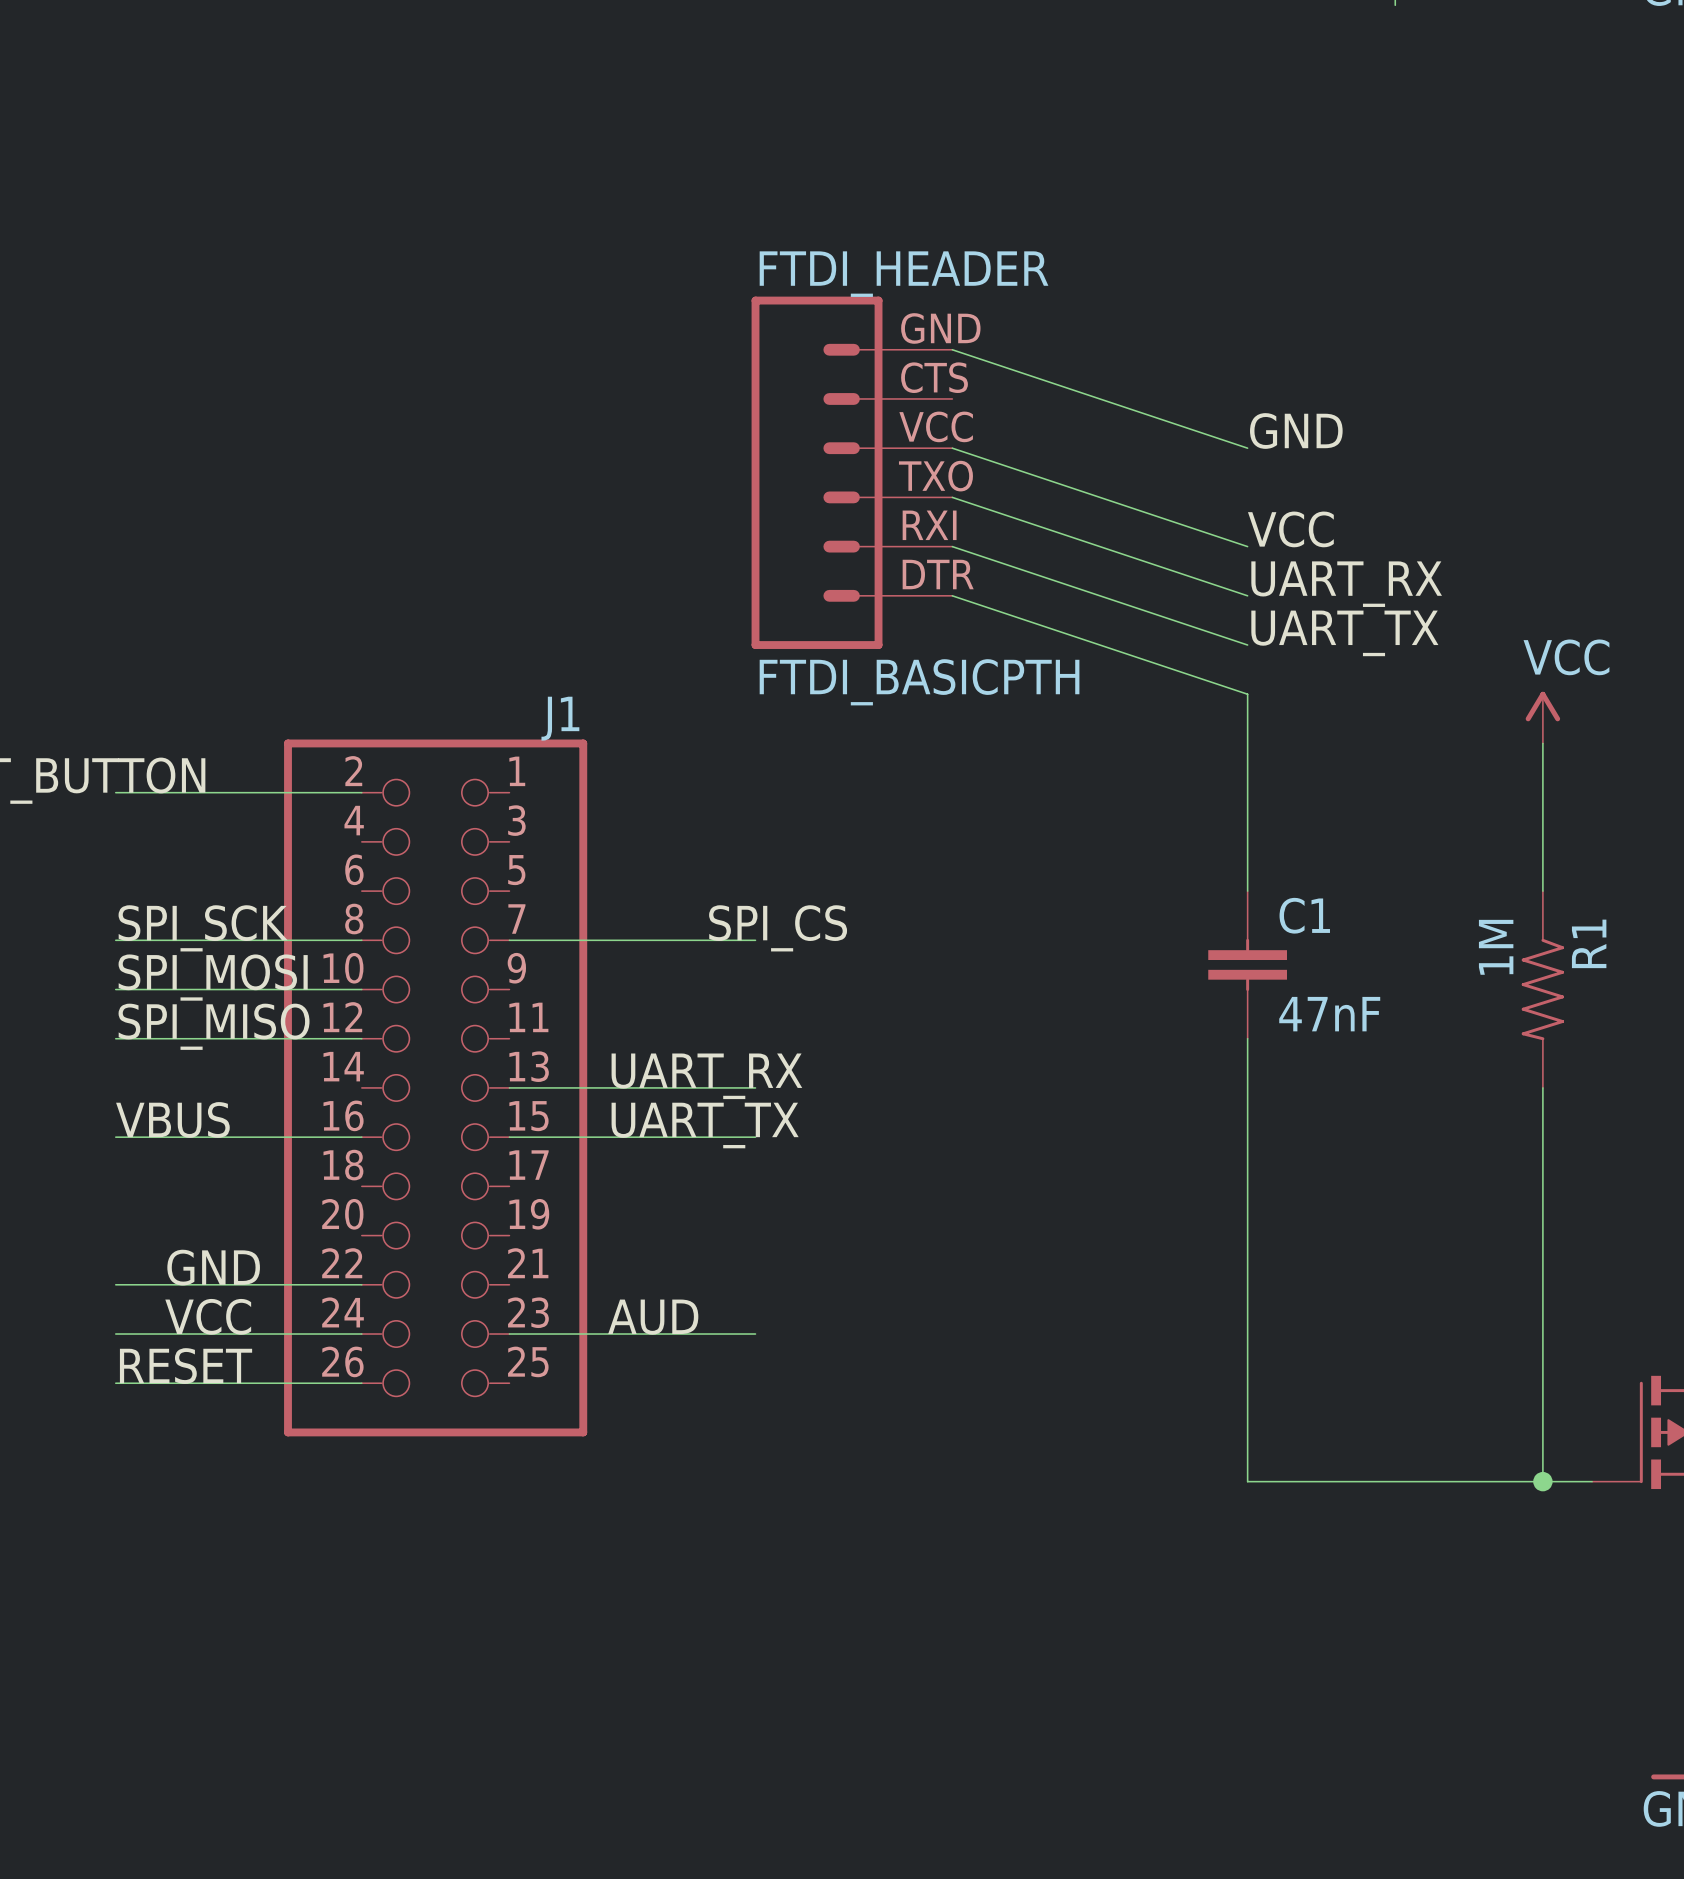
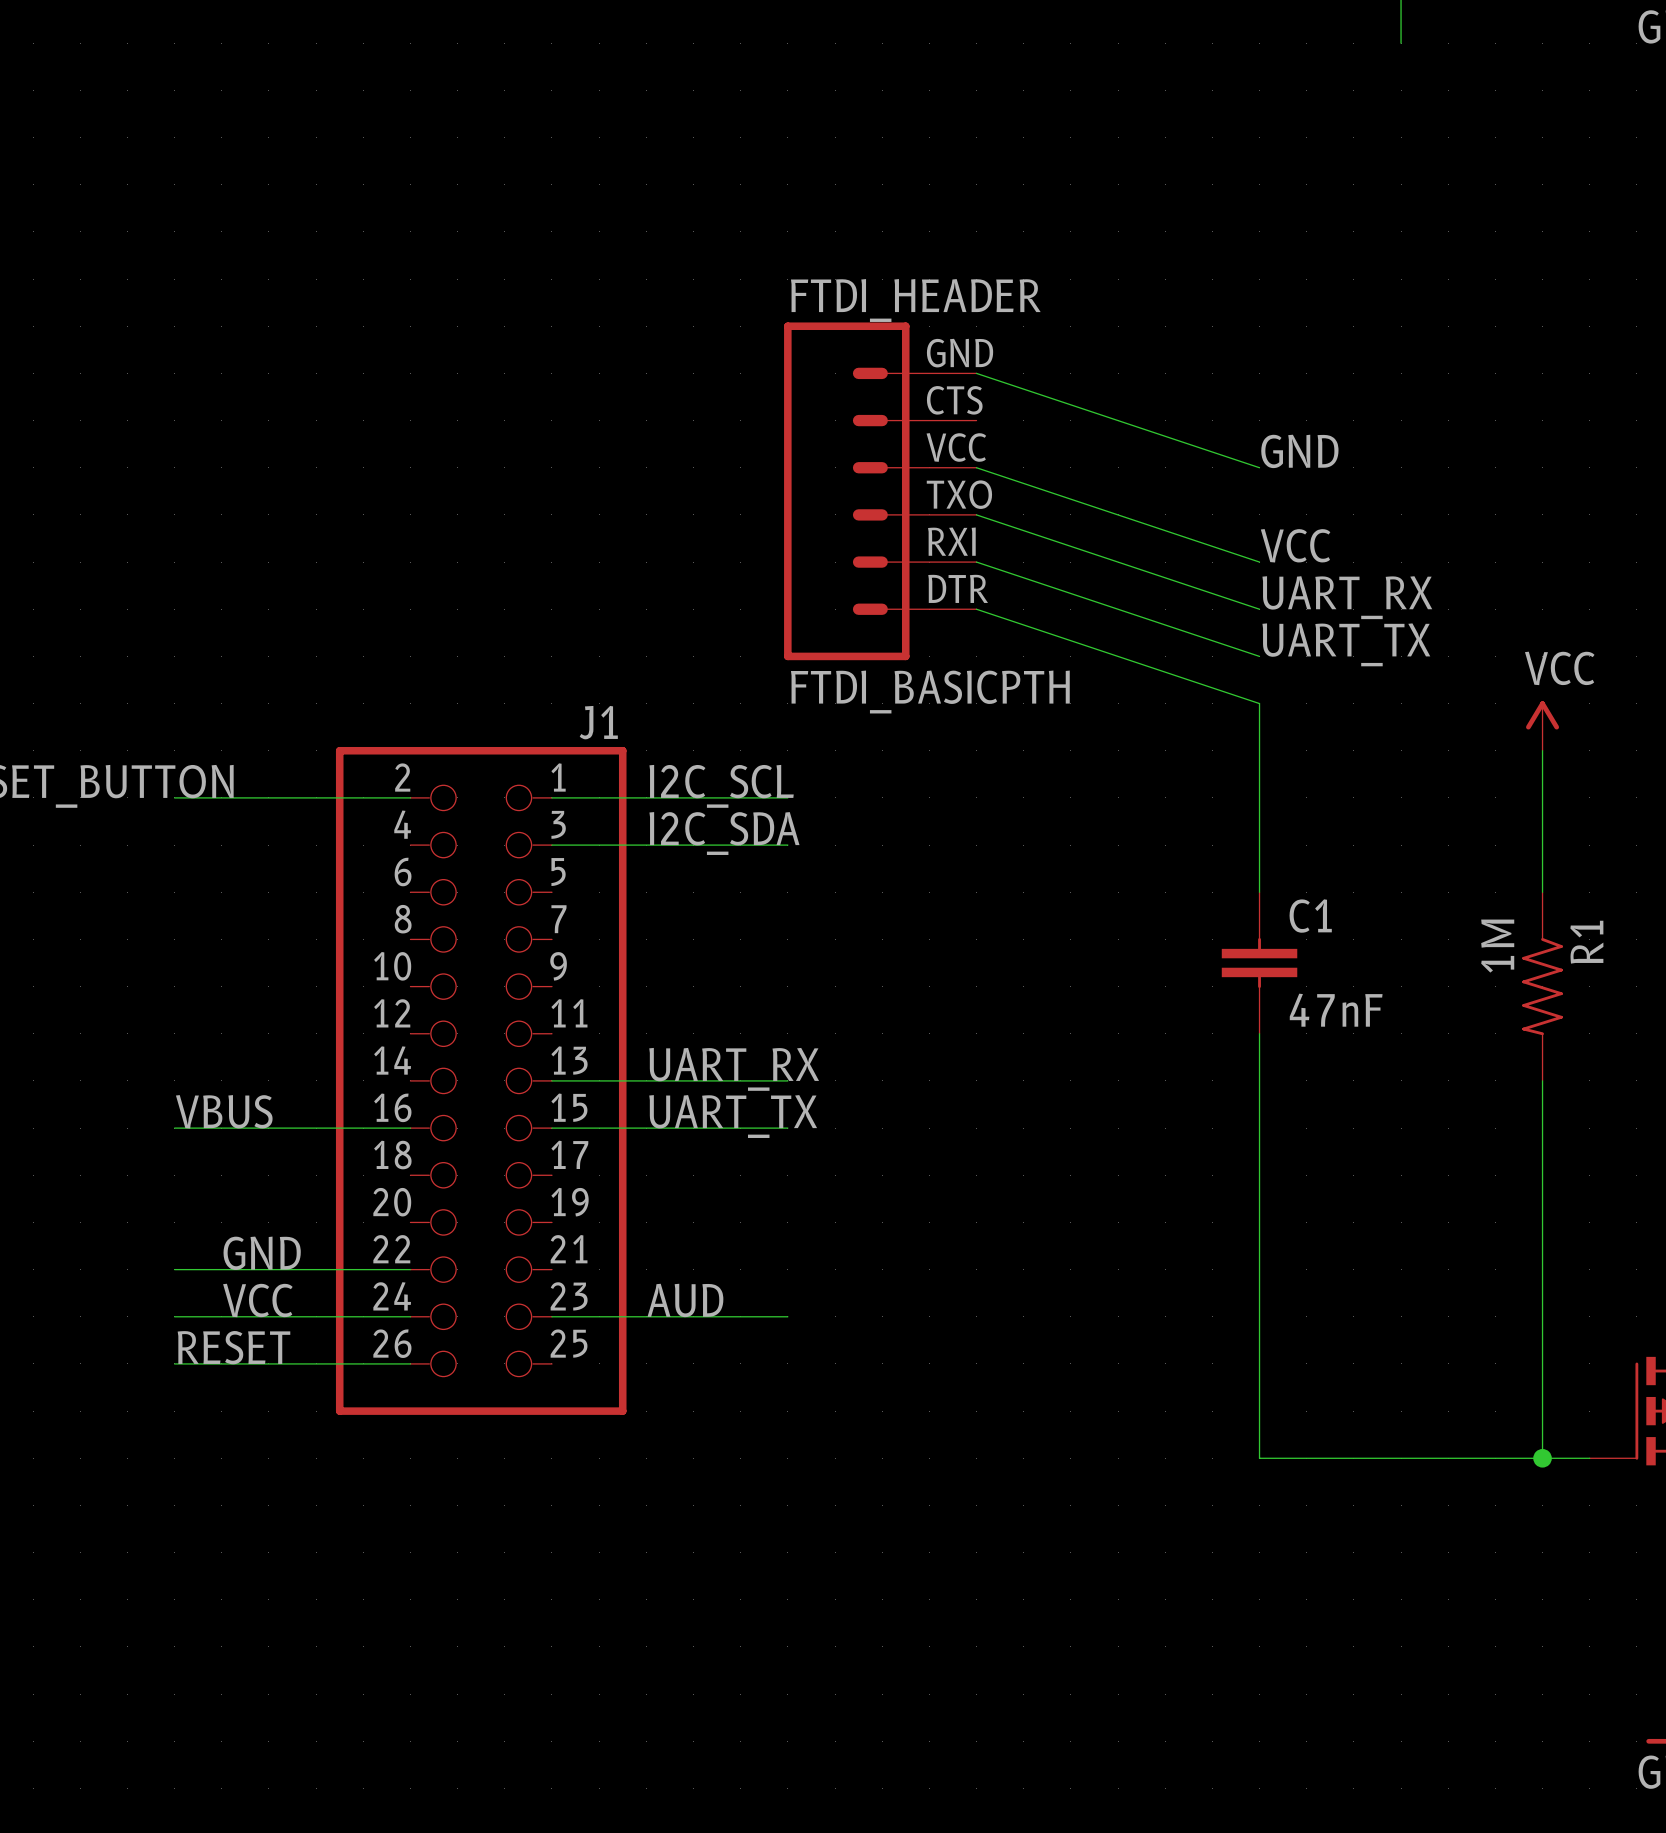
label: none -> I2C_SCL (721, 786)
label: none -> I2C_SDA (724, 833)
label: SPI_SCK (203, 928) -> none
label: SPI_CS (778, 928) -> none
wire: (115, 940) (361, 940) -> (551, 797) (787, 797)
wire: (509, 940) (755, 940) -> (551, 845) (787, 845)
label: SPI_MOSI (213, 977) -> none
wire: (115, 989) (361, 989) -> none
label: SPI_MISO (214, 1026) -> none
wire: (115, 1038) (361, 1038) -> none

